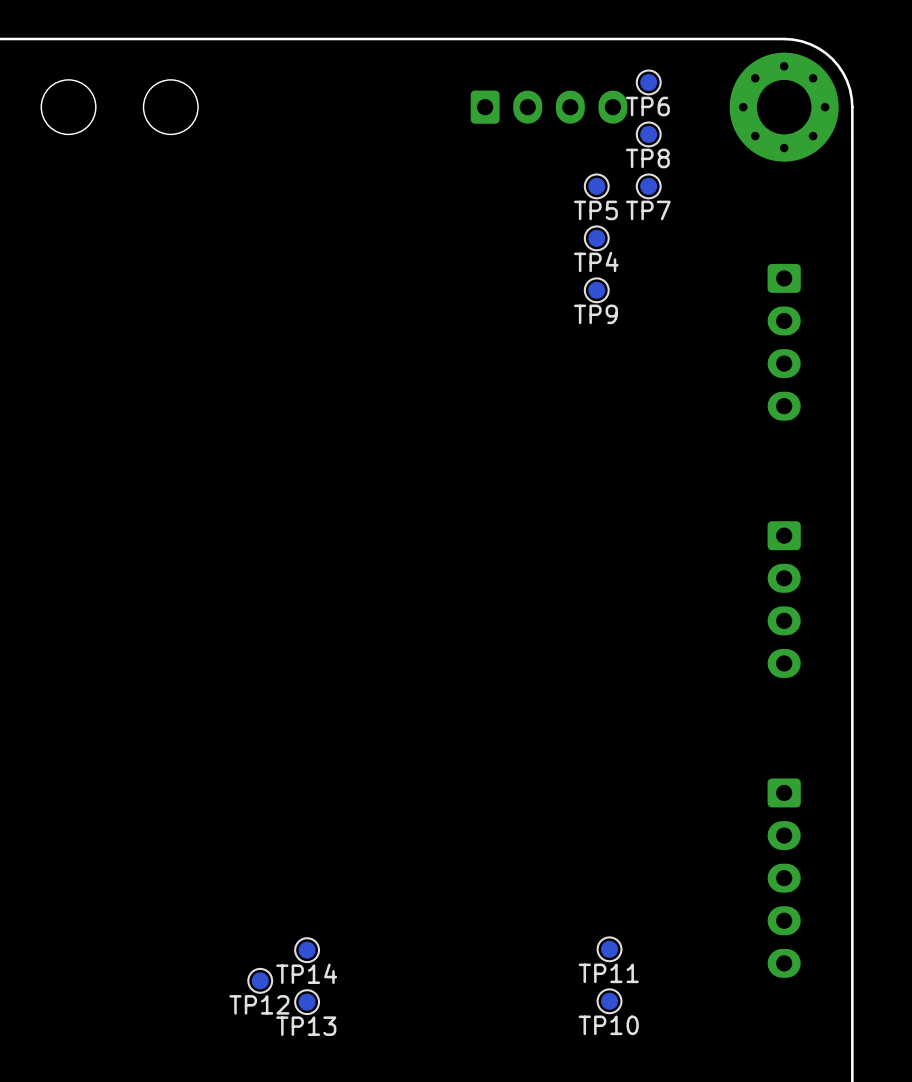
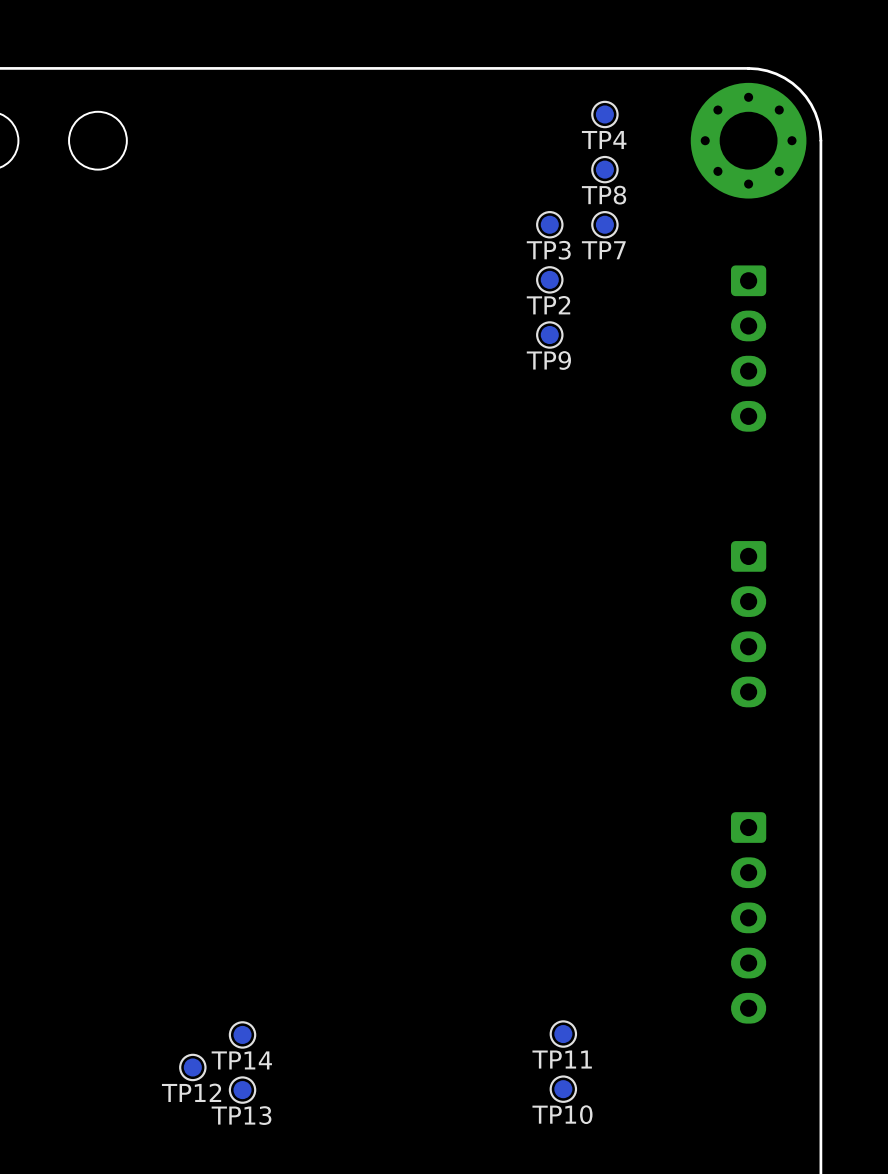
TP6 name: TP6 (647, 106) -> TP4 (604, 140)
part: (549, 107) -> none
TP5 name: TP5 (595, 210) -> TP3 (548, 250)
TP4 name: TP4 (596, 261) -> TP2 (548, 305)
part position: (784, 342) -> (748, 348)
part position: (784, 599) -> (748, 624)
part position: (784, 878) -> (748, 917)

